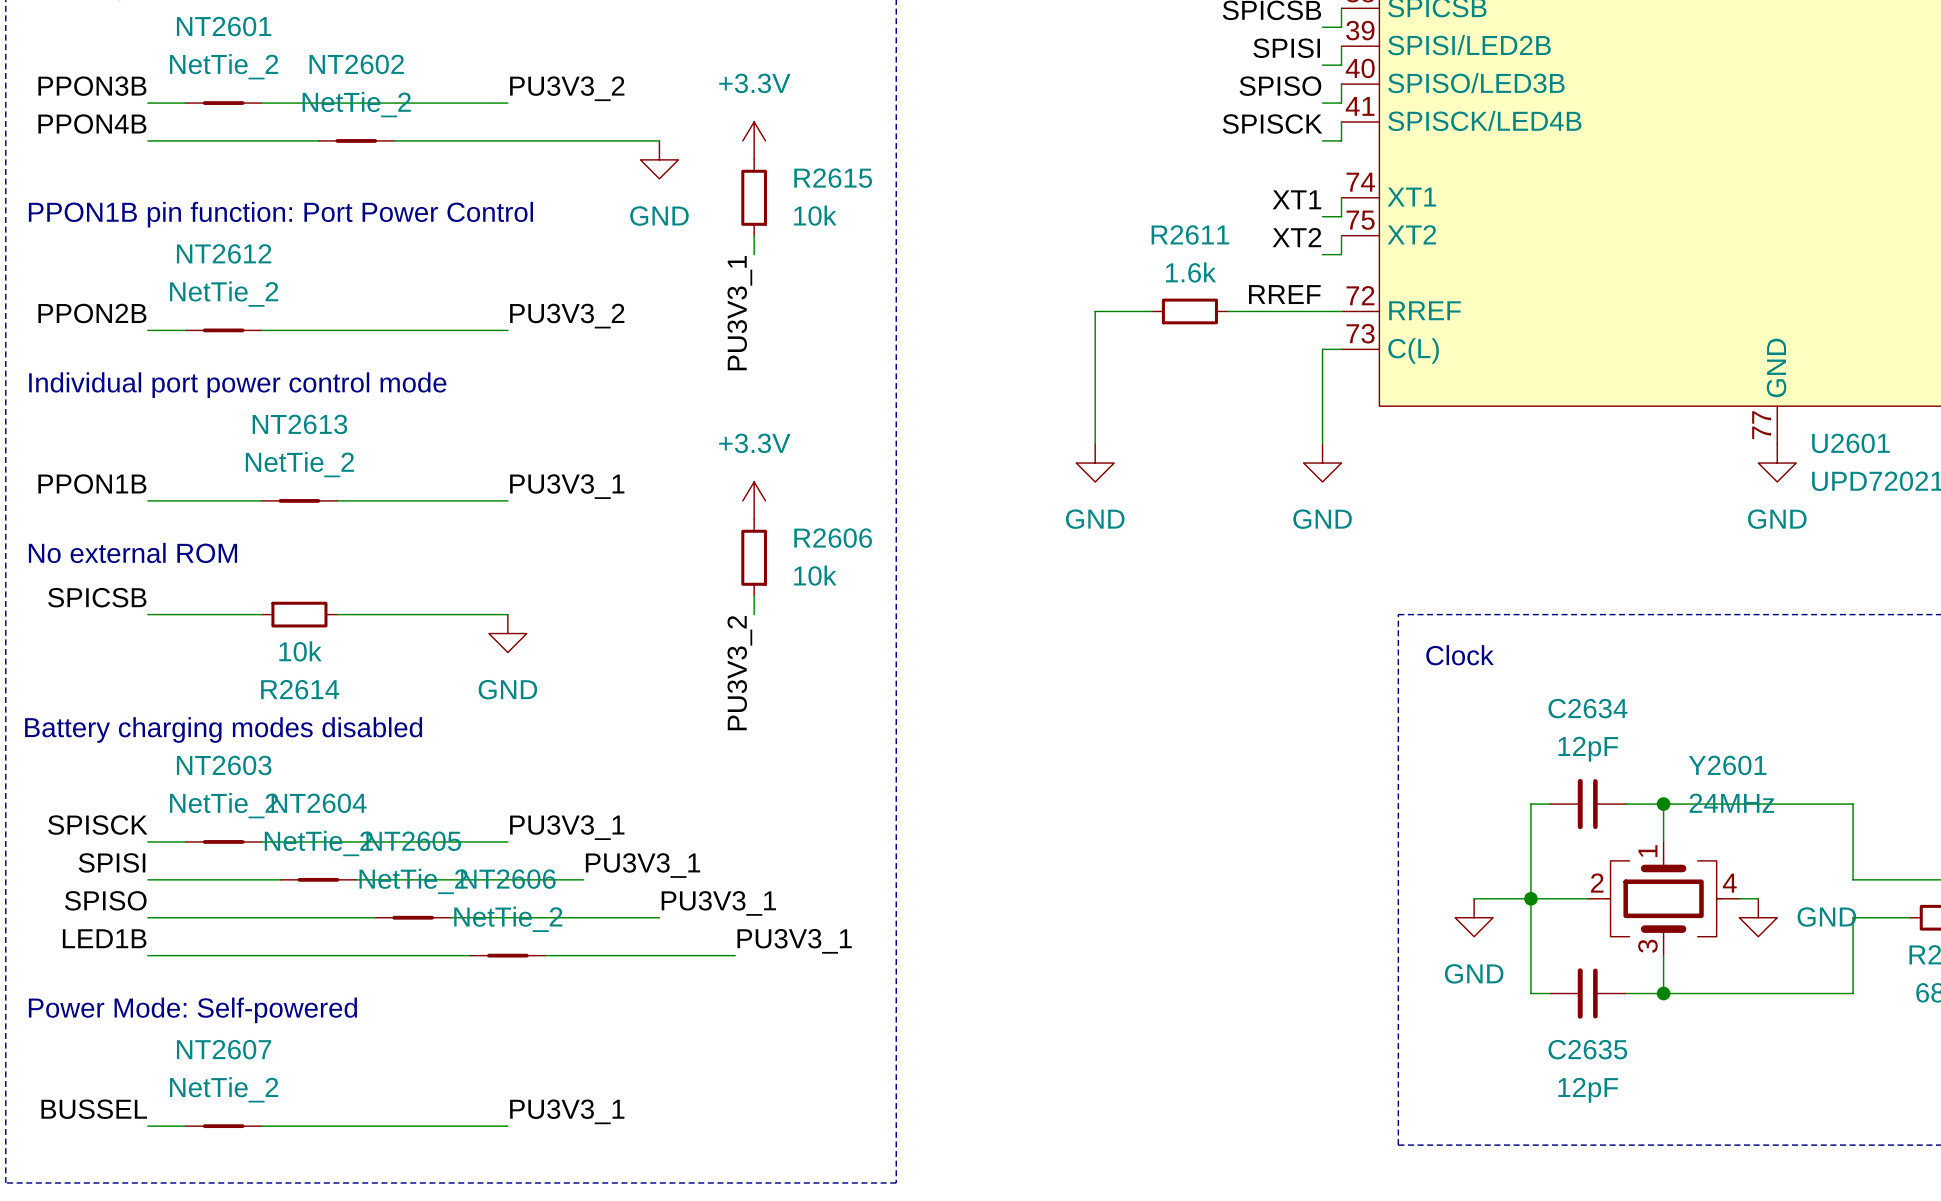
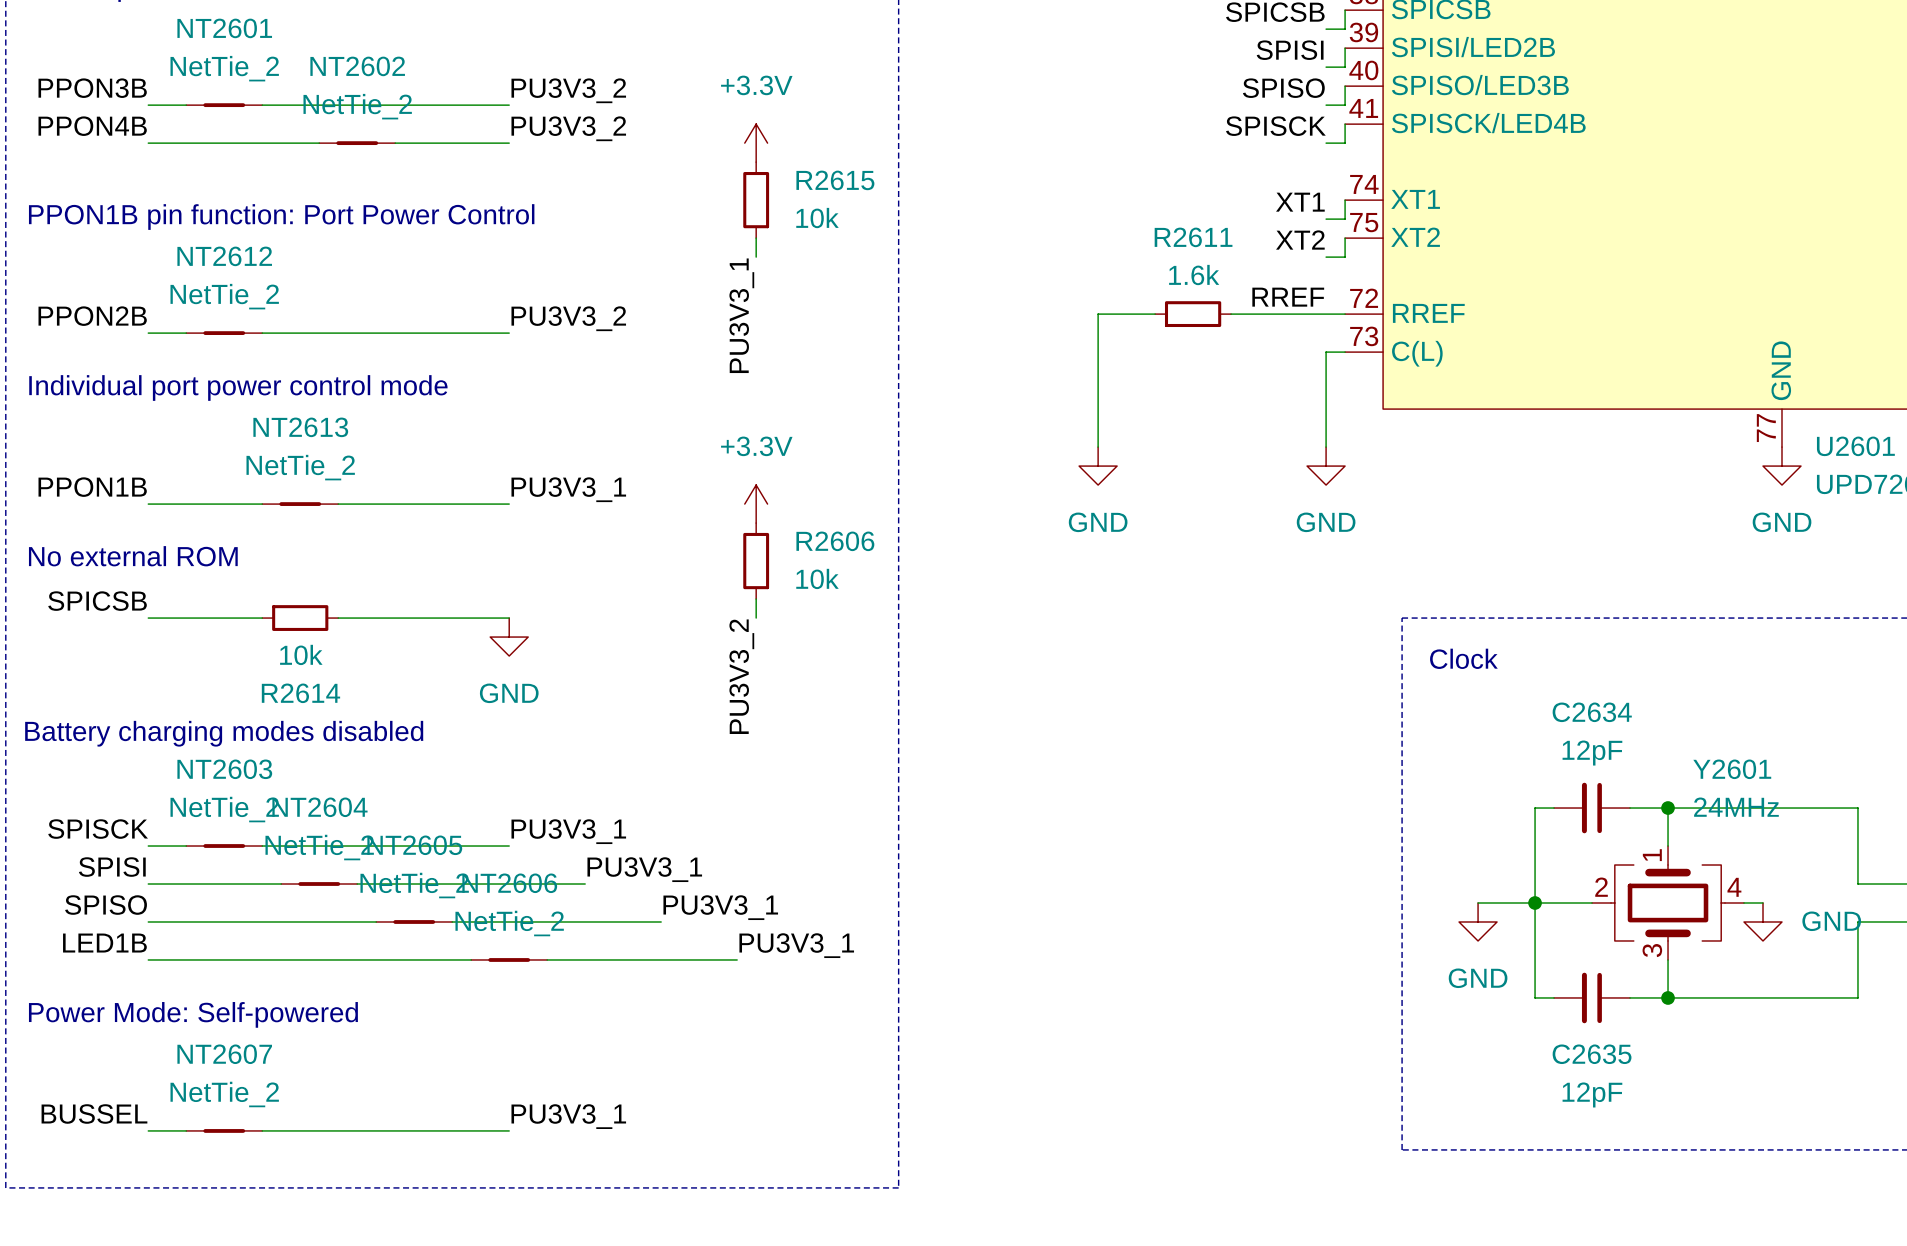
label: none -> PU3V3_2 (568, 128)
wire: (507, 140) (659, 140) -> none
power symbol: GND (659, 159) -> none

